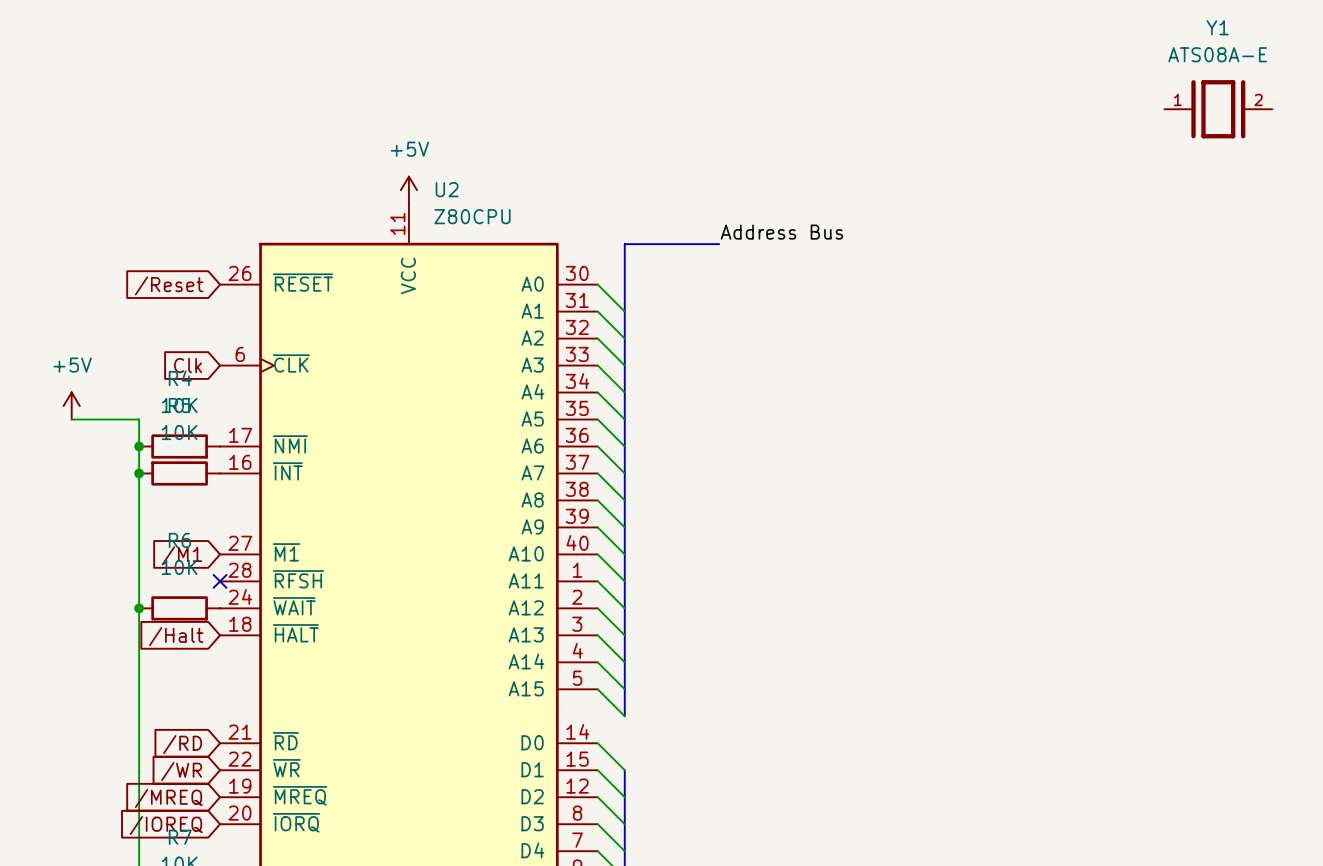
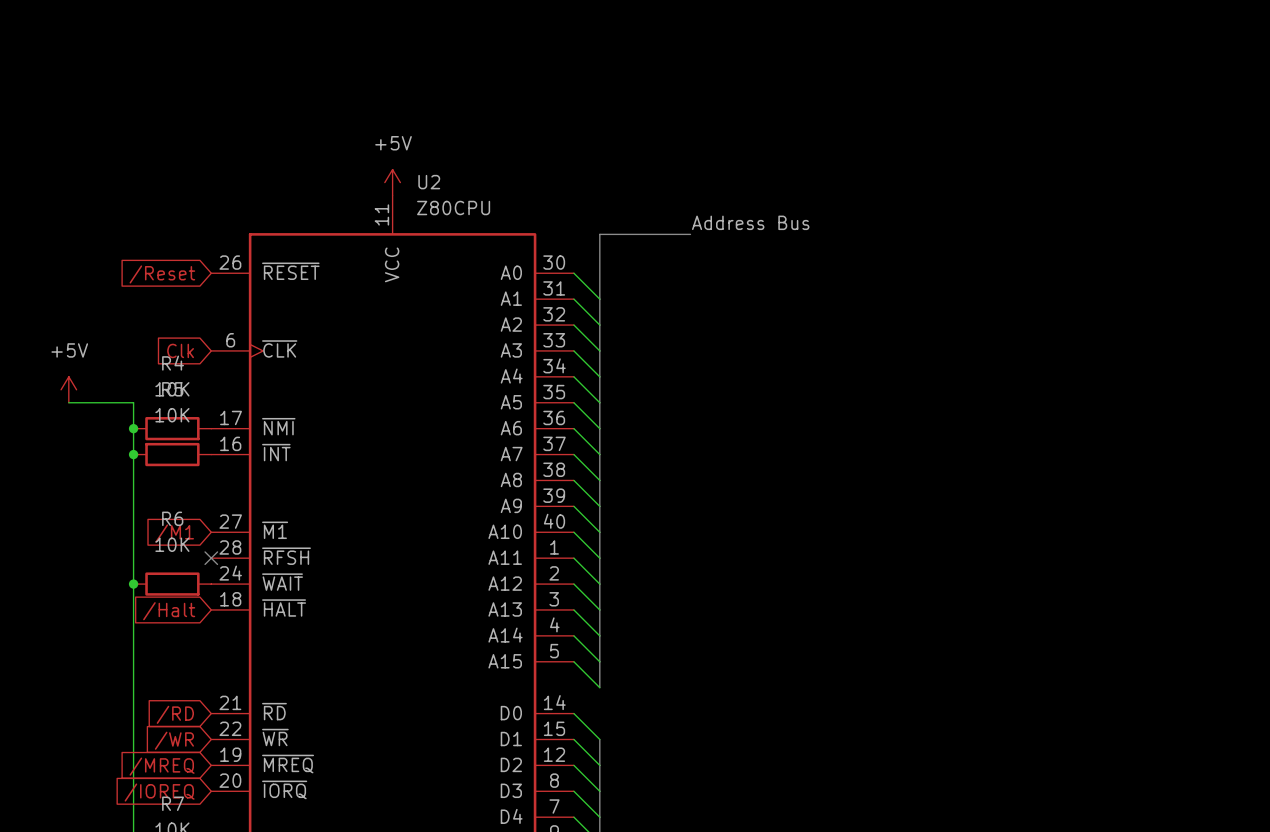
Y1: ATS08A-E (1218, 109) -> none

